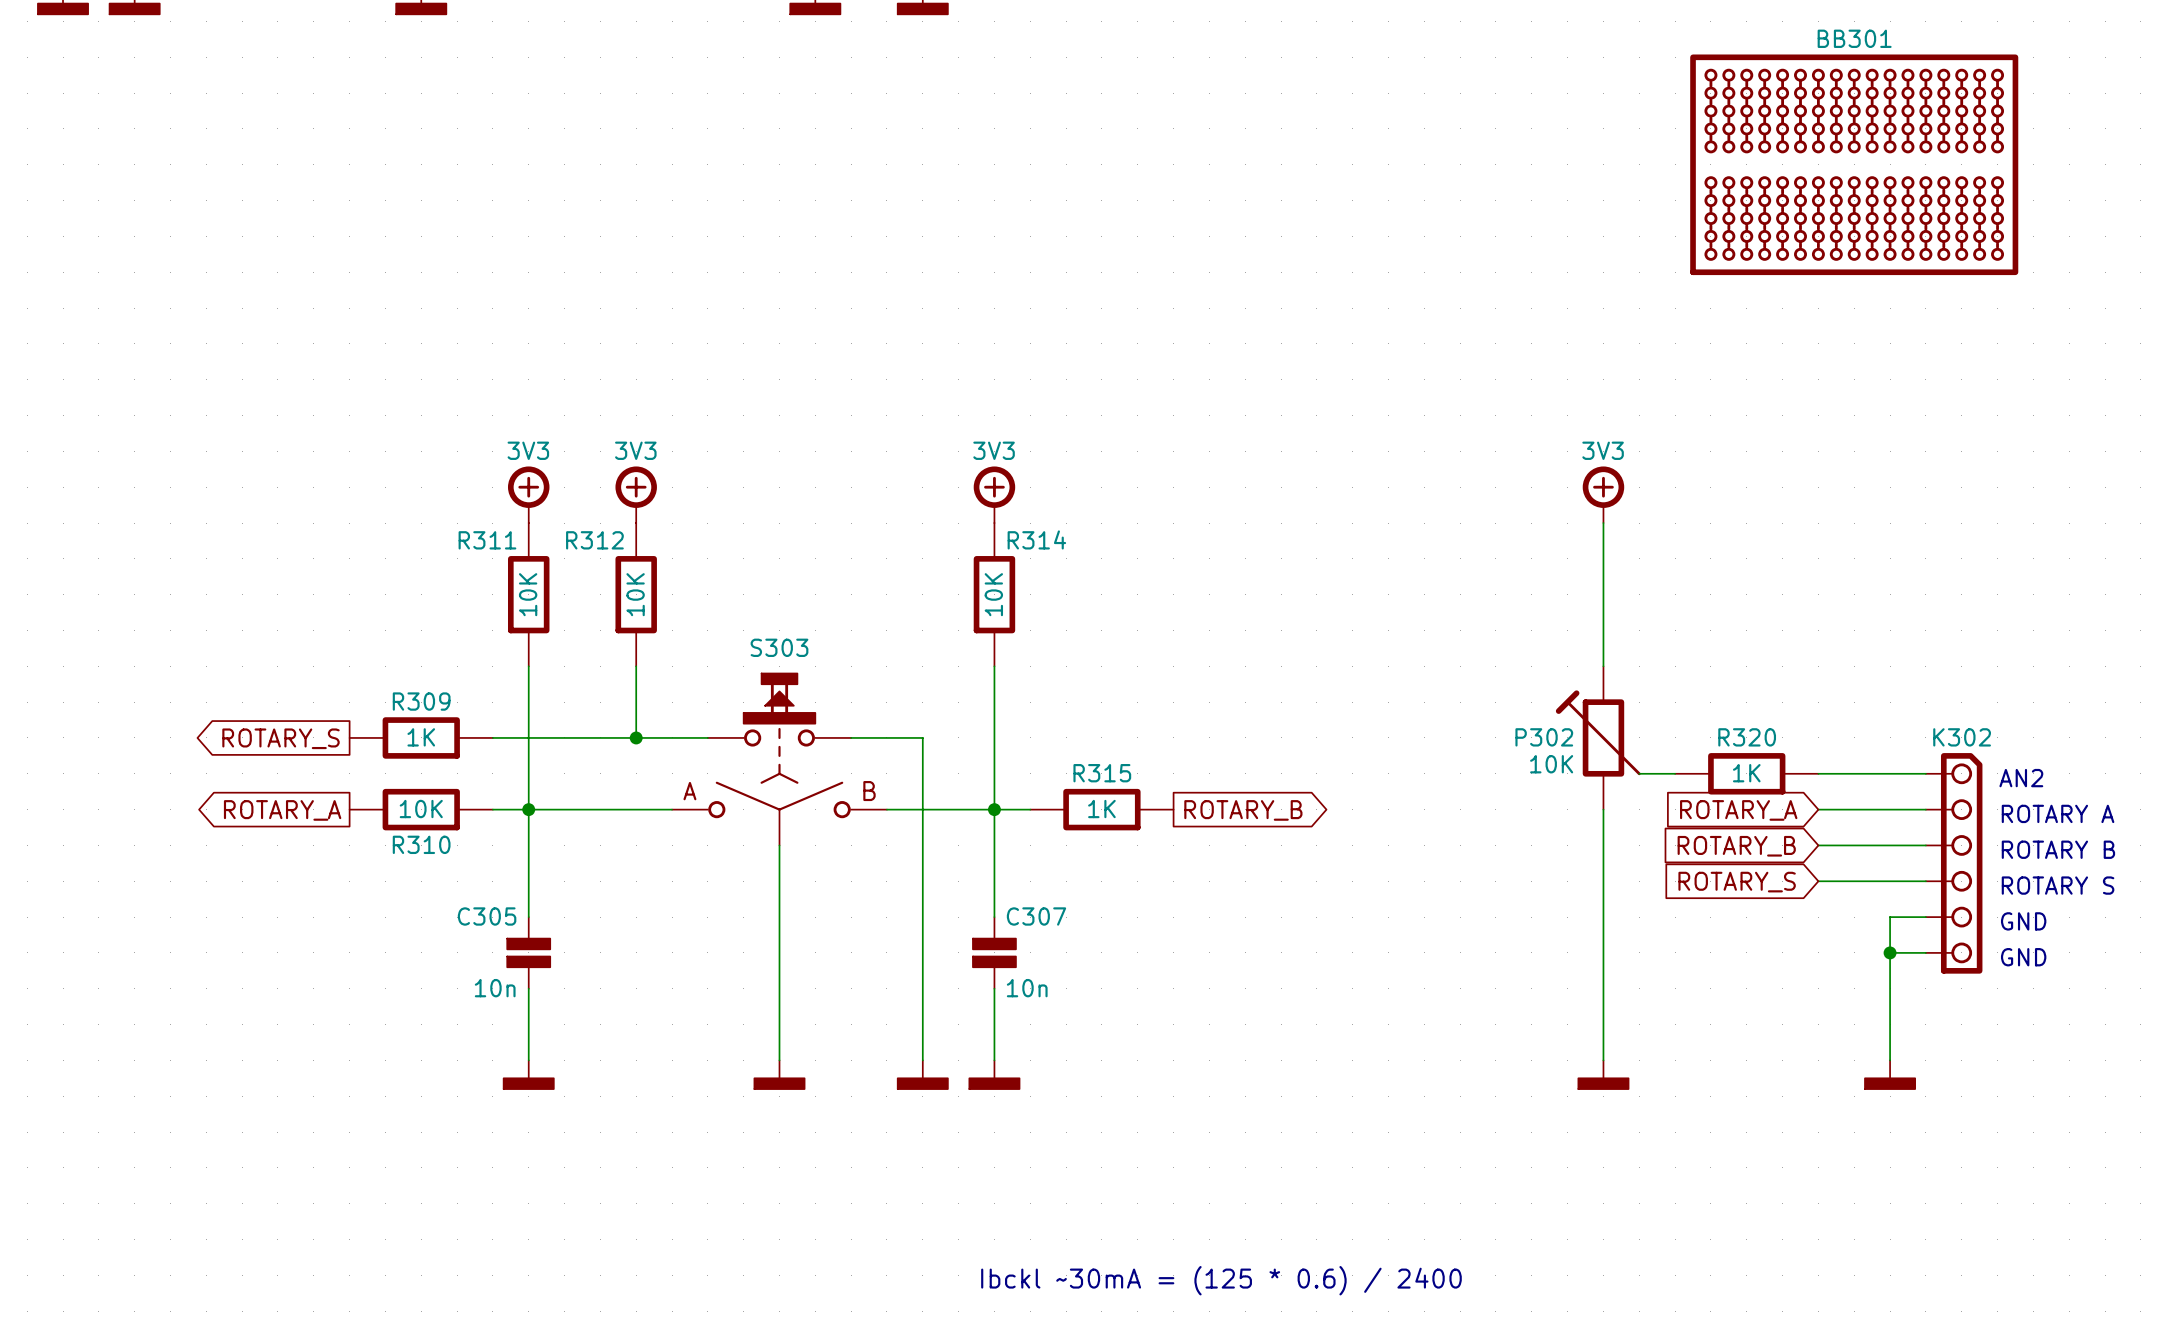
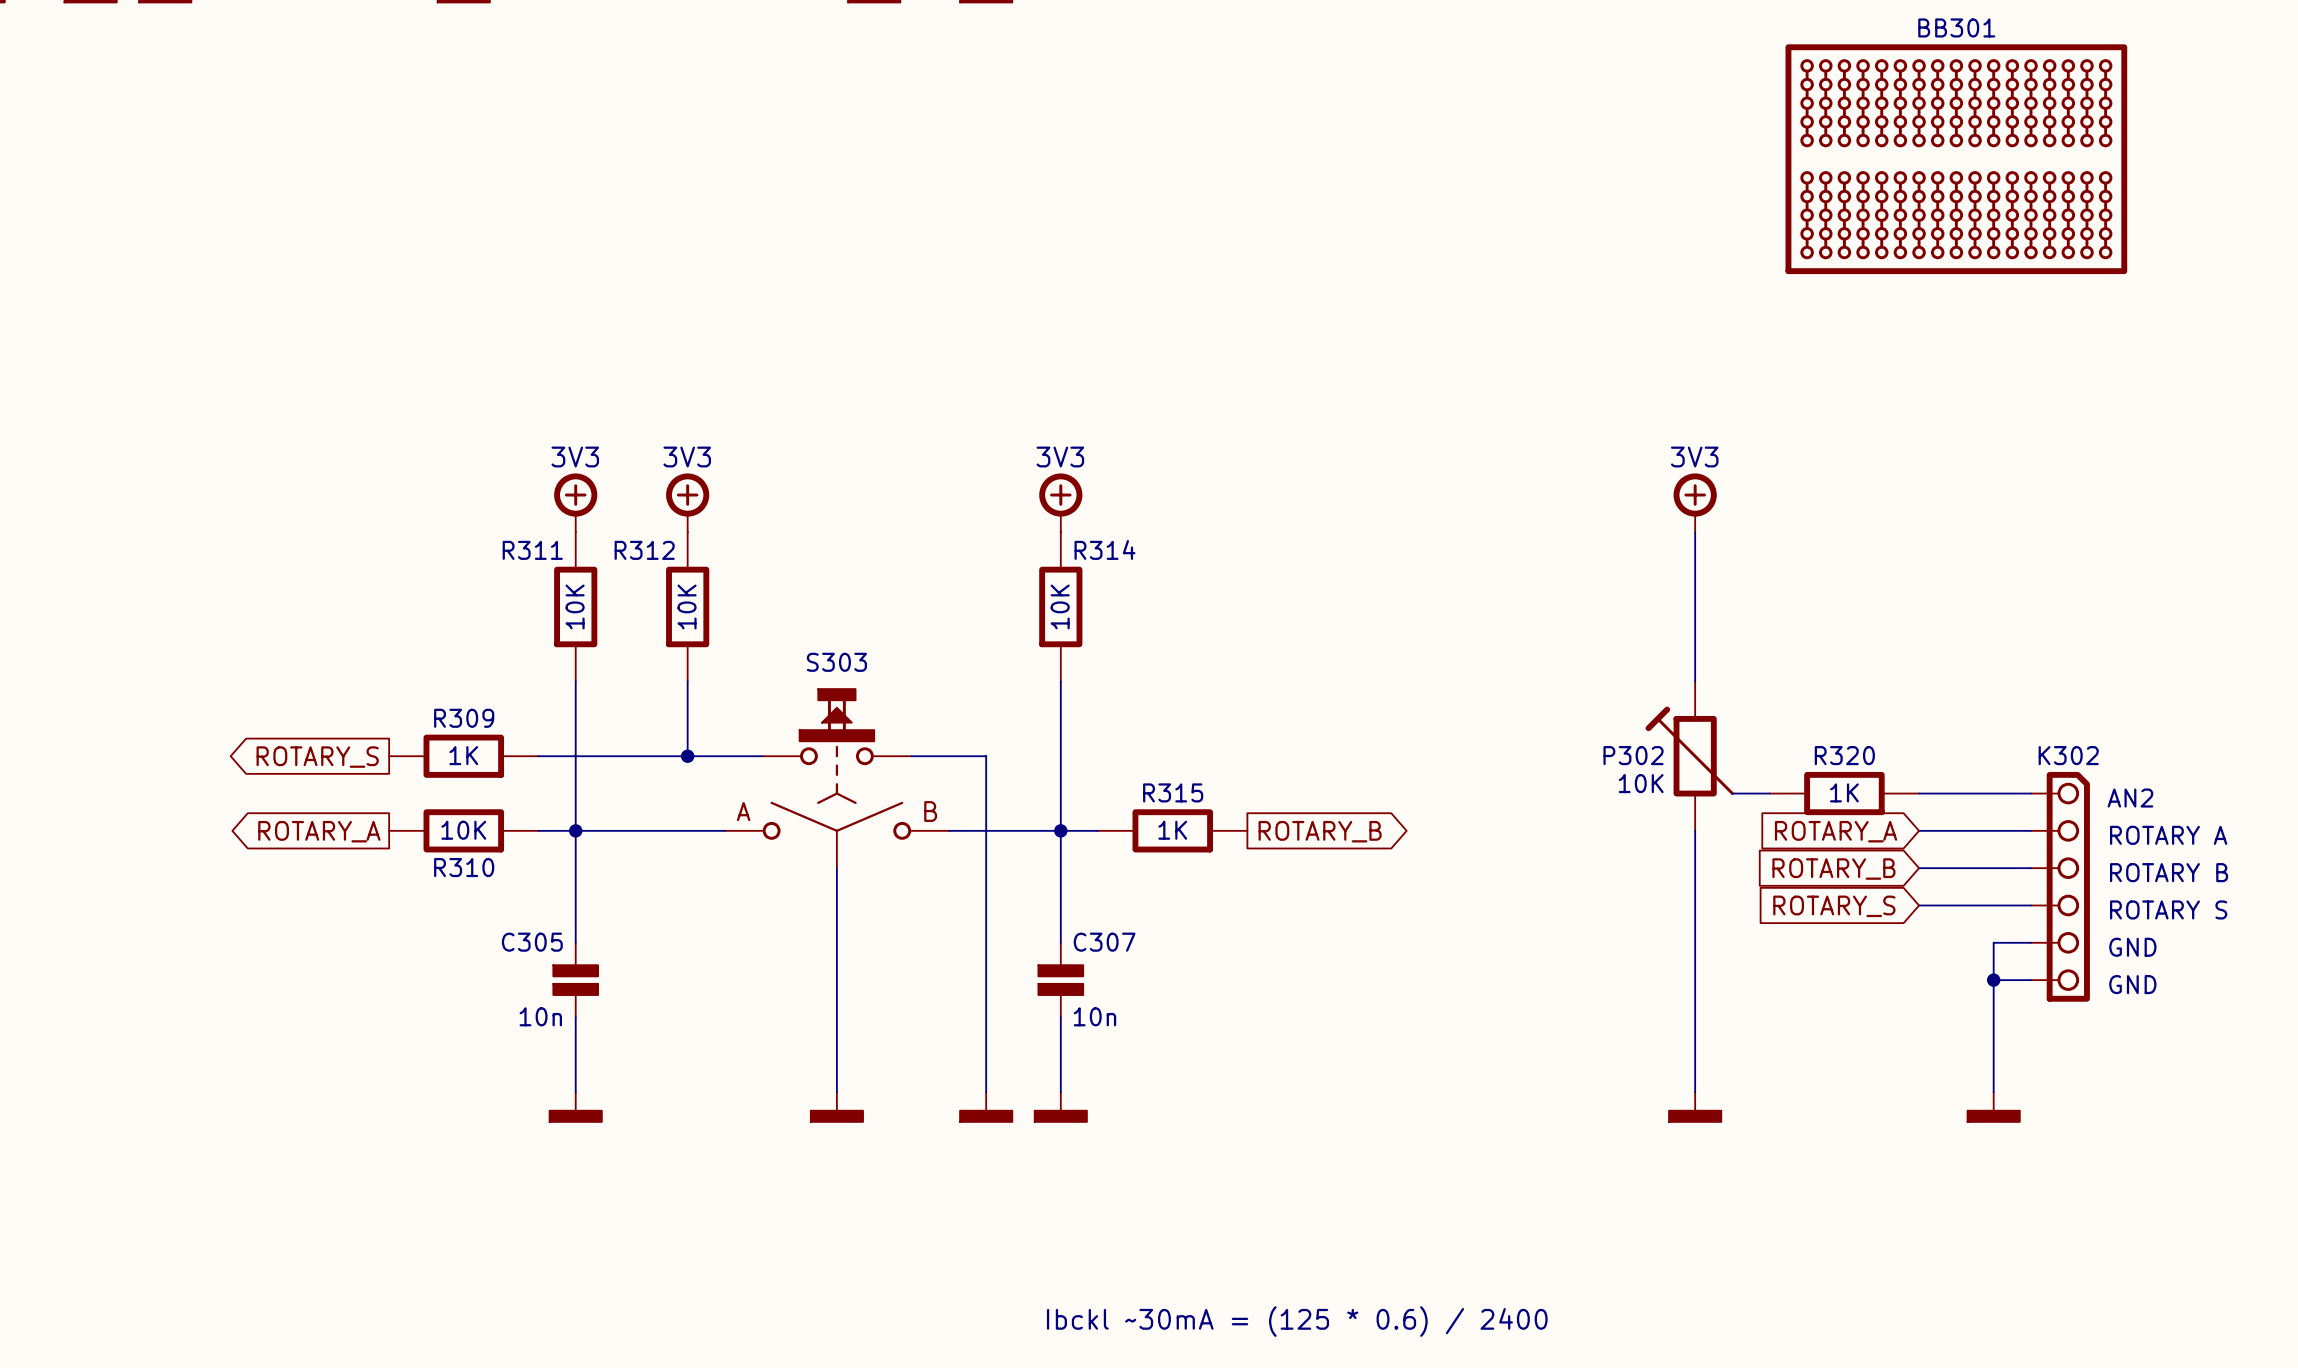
power symbol text: none -> 3V3 (575, 457)
power symbol text: 3V3 (528, 450) -> none
power symbol text: none -> 3V3 (687, 457)
power symbol text: 3V3 (635, 450) -> none
power symbol text: none -> 3V3 (1060, 457)
power symbol text: 3V3 (994, 450) -> none
power symbol text: none -> 3V3 (1694, 457)
power symbol text: 3V3 (1603, 450) -> none

